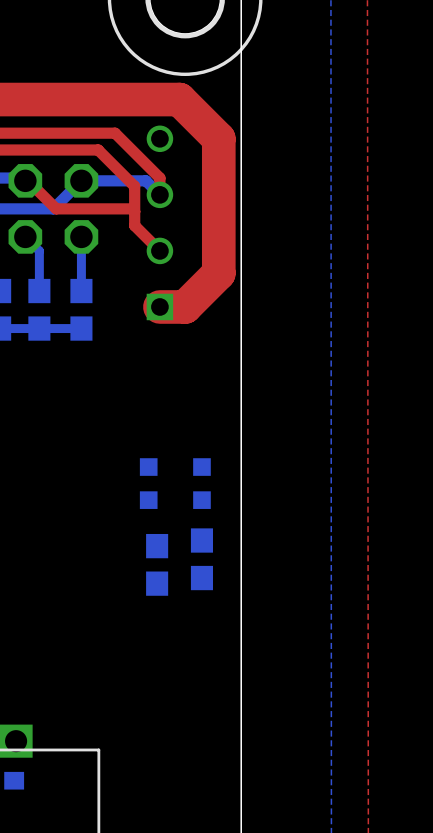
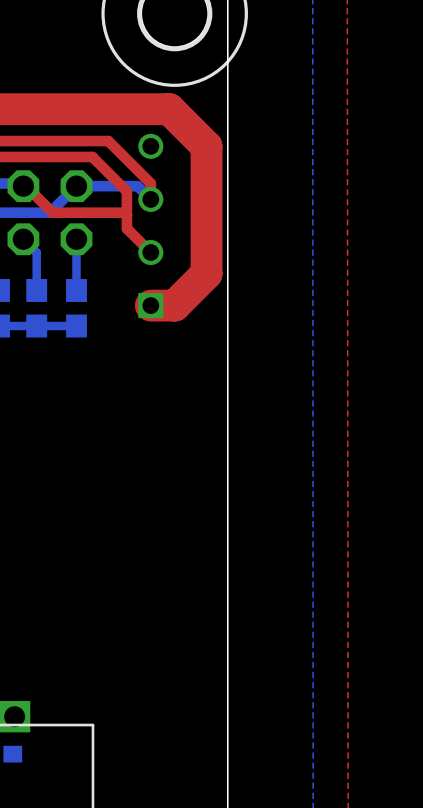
part: (148, 483) -> none
part: (201, 483) -> none
part: (201, 559) -> none
part: (157, 564) -> none

